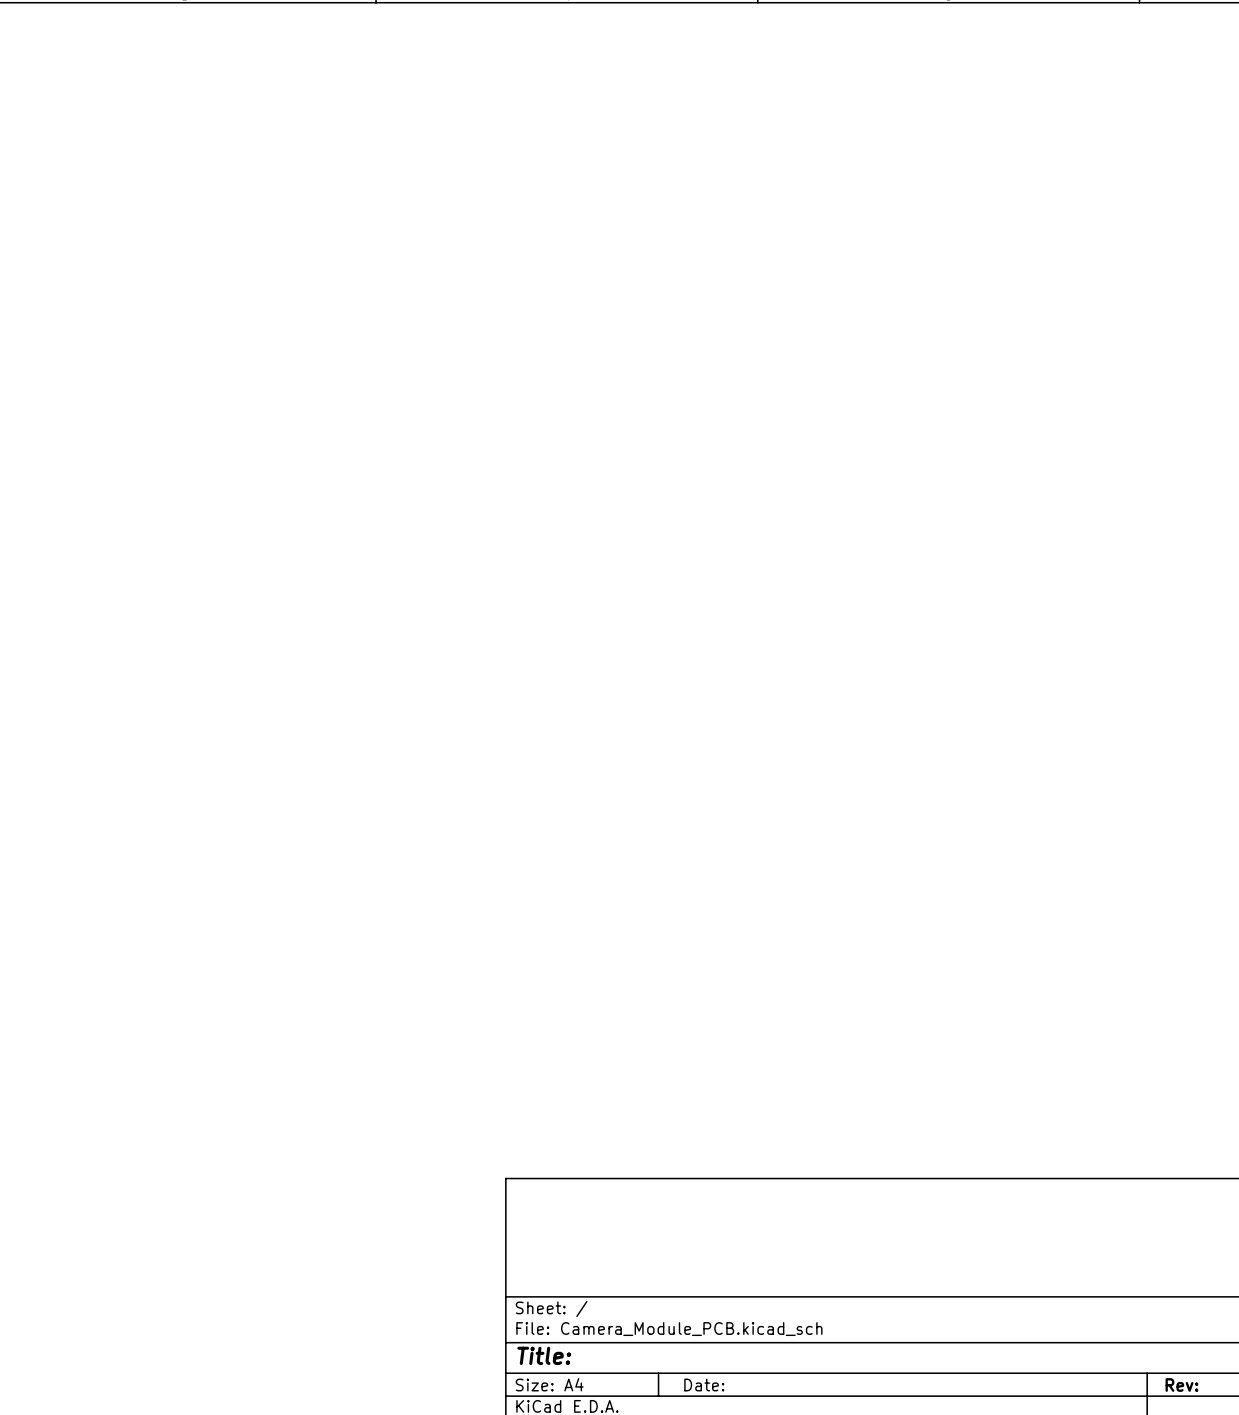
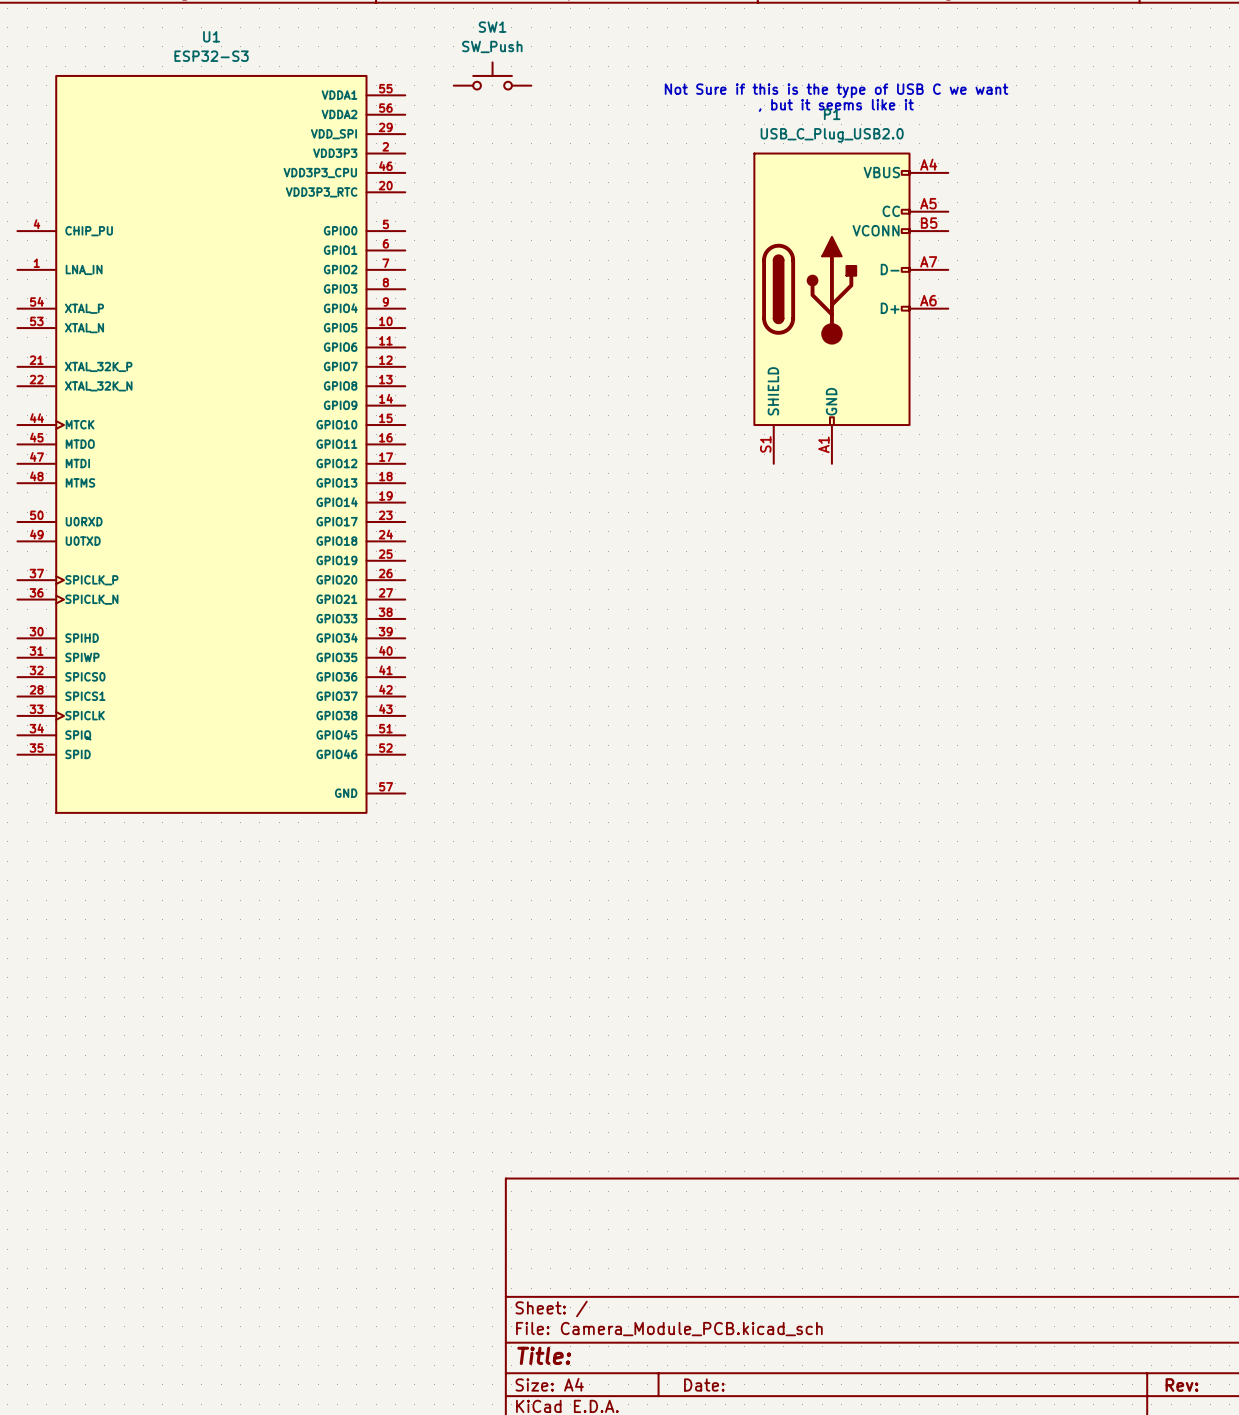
SW1: none -> SW_Push (492, 75)
text: none -> Not Sure if this is the type of USB C we want (836, 90)
text: none -> , but it seems like it (836, 105)
P1: none -> USB_C_Plug_USB2.0 (850, 308)
U1: none -> ESP32-S3 (211, 444)

